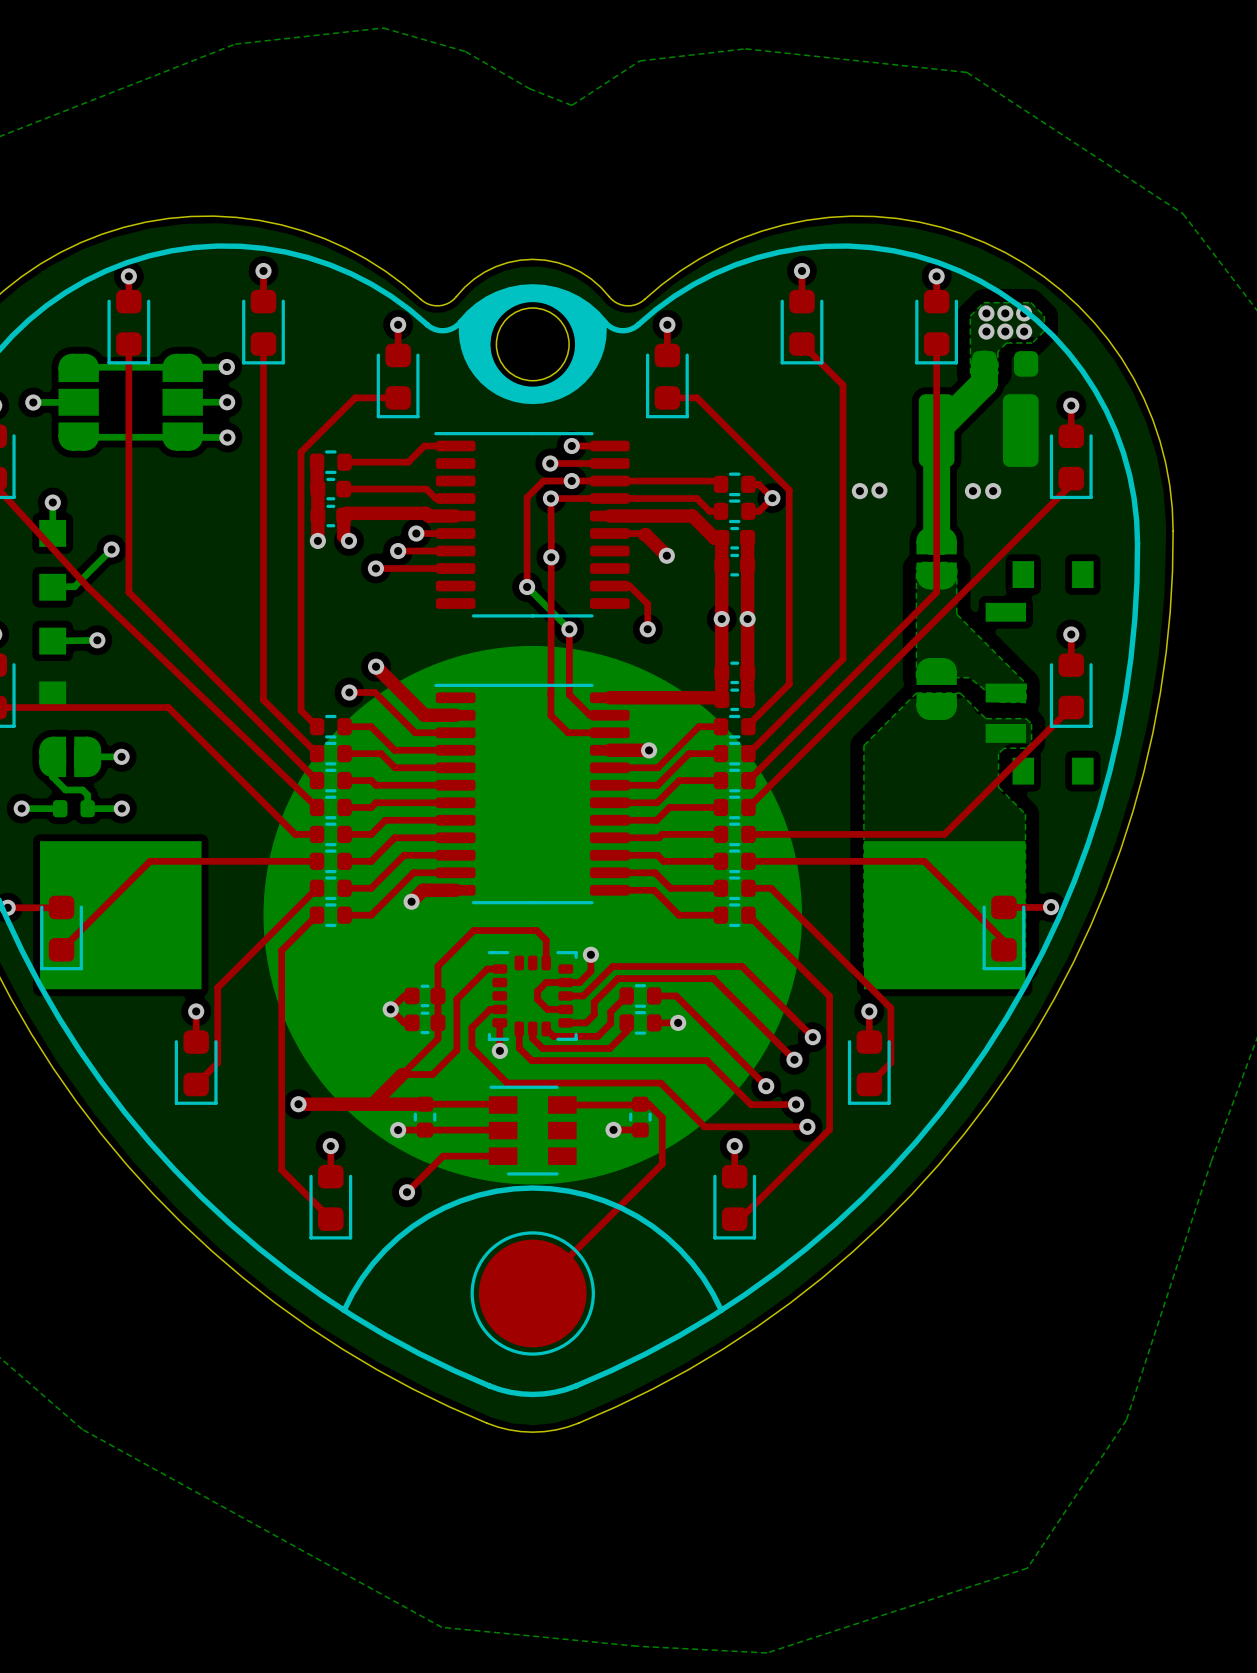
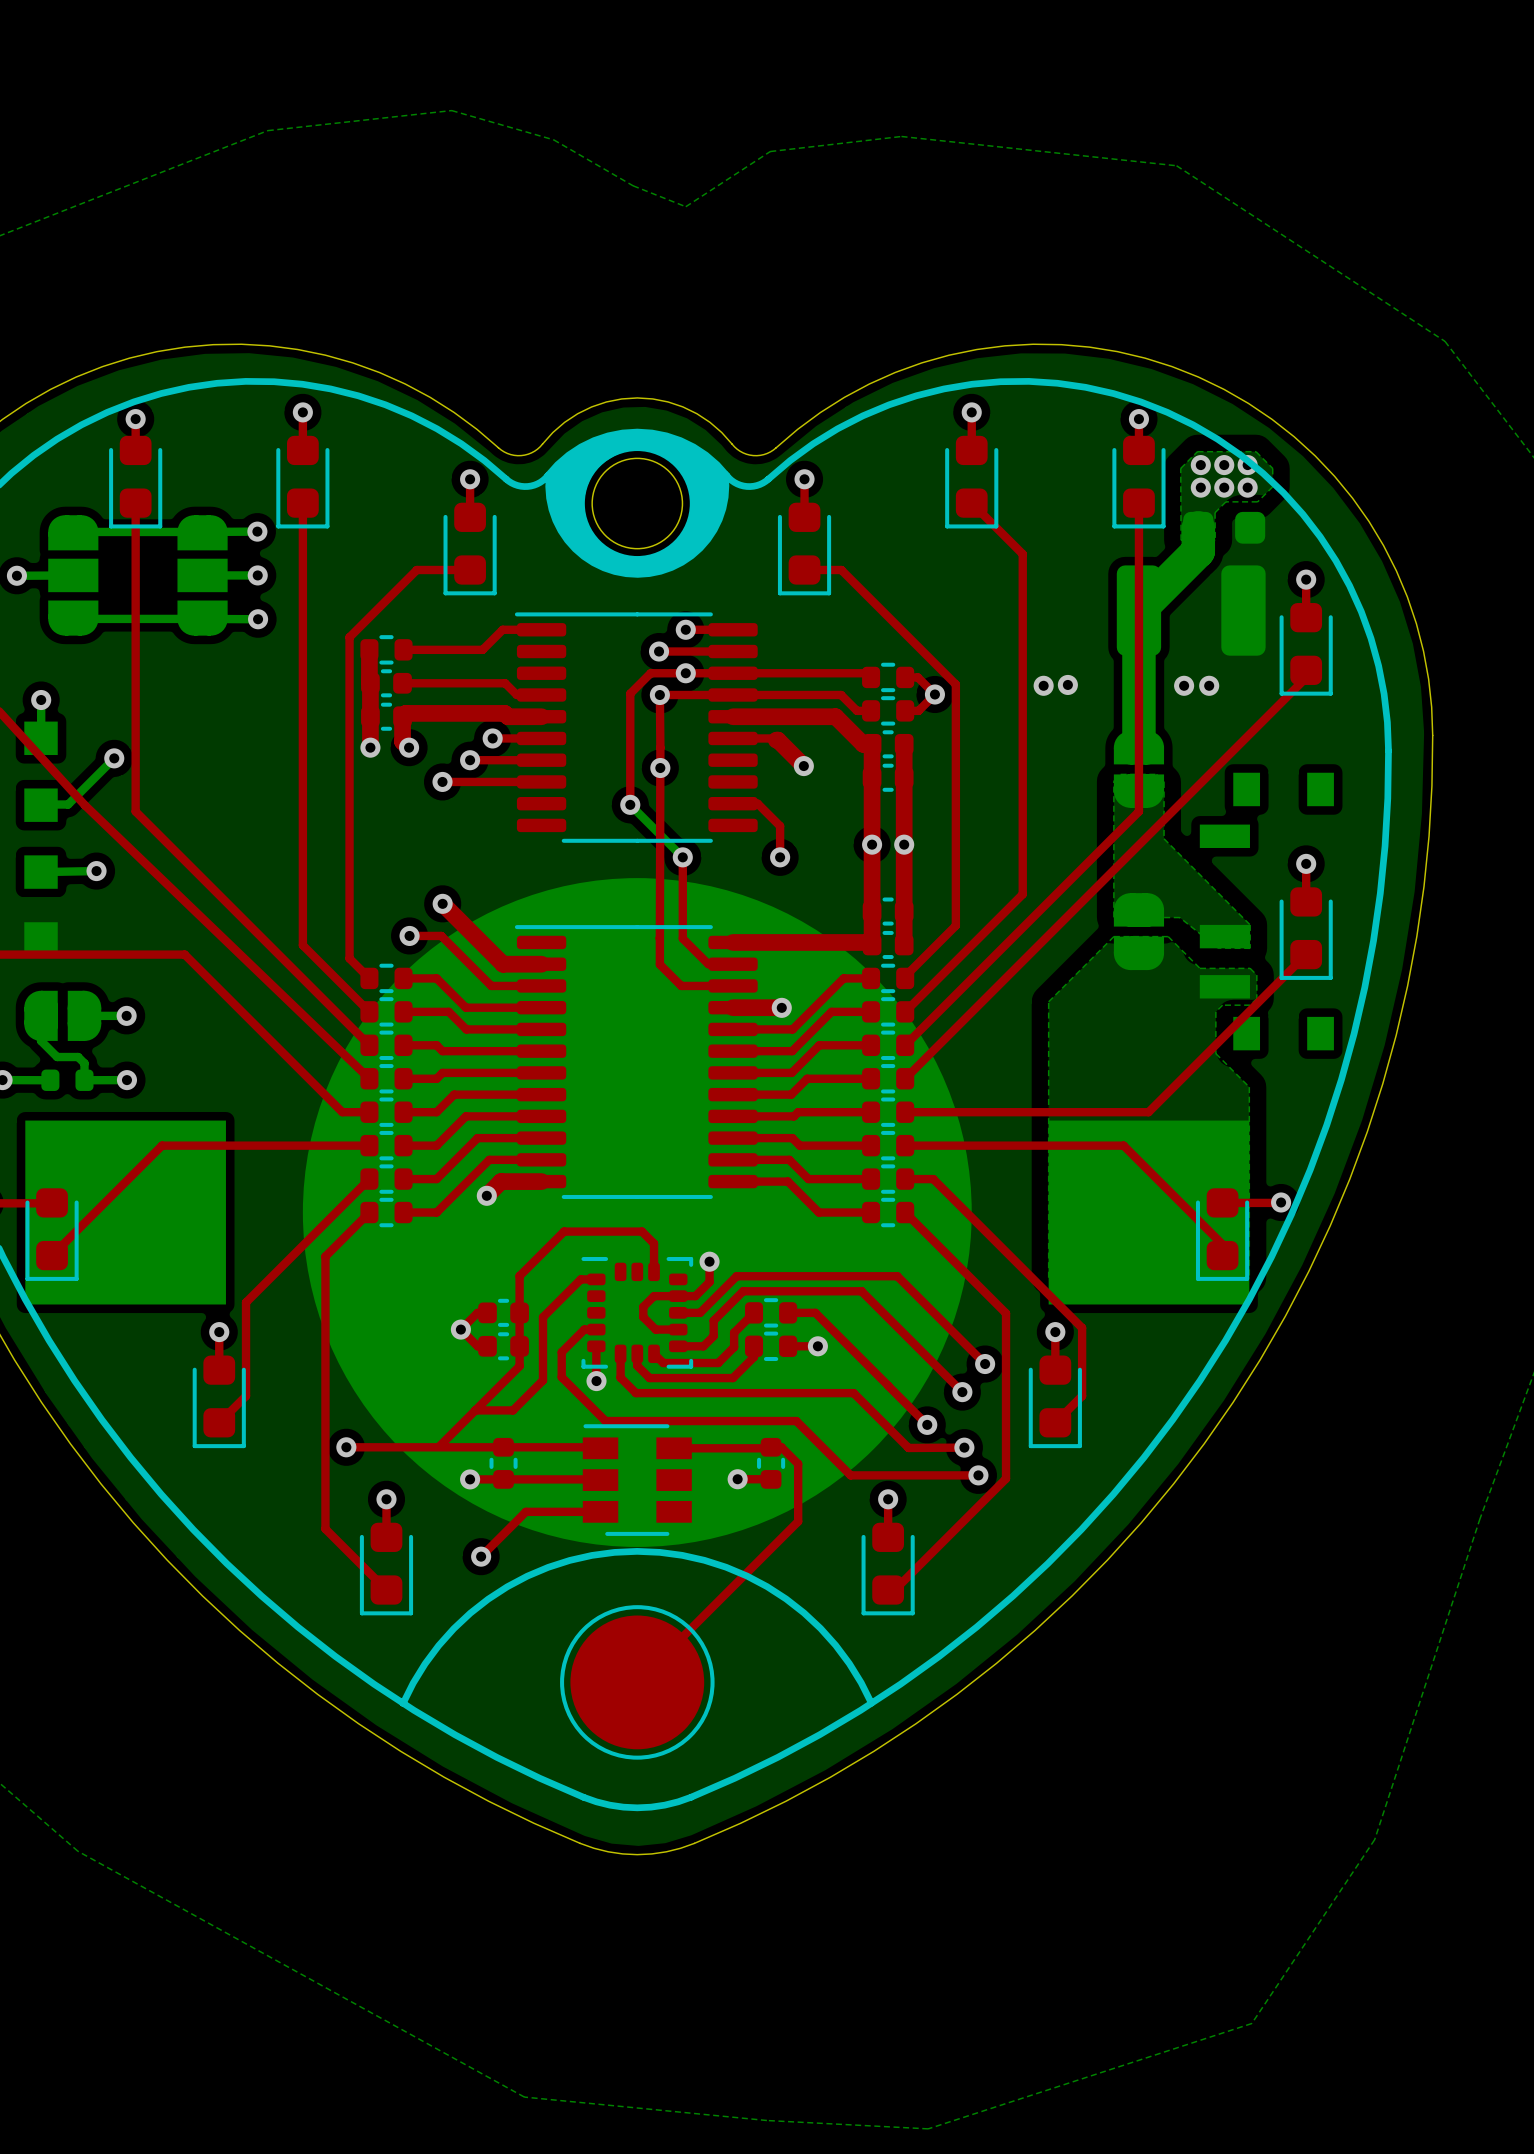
top track width: thick (402, 1074) (373, 1103) -> thin (475, 1410) (439, 1446)
top track width: thick (298, 1104) (425, 1104) -> thin (346, 1447) (503, 1447)

